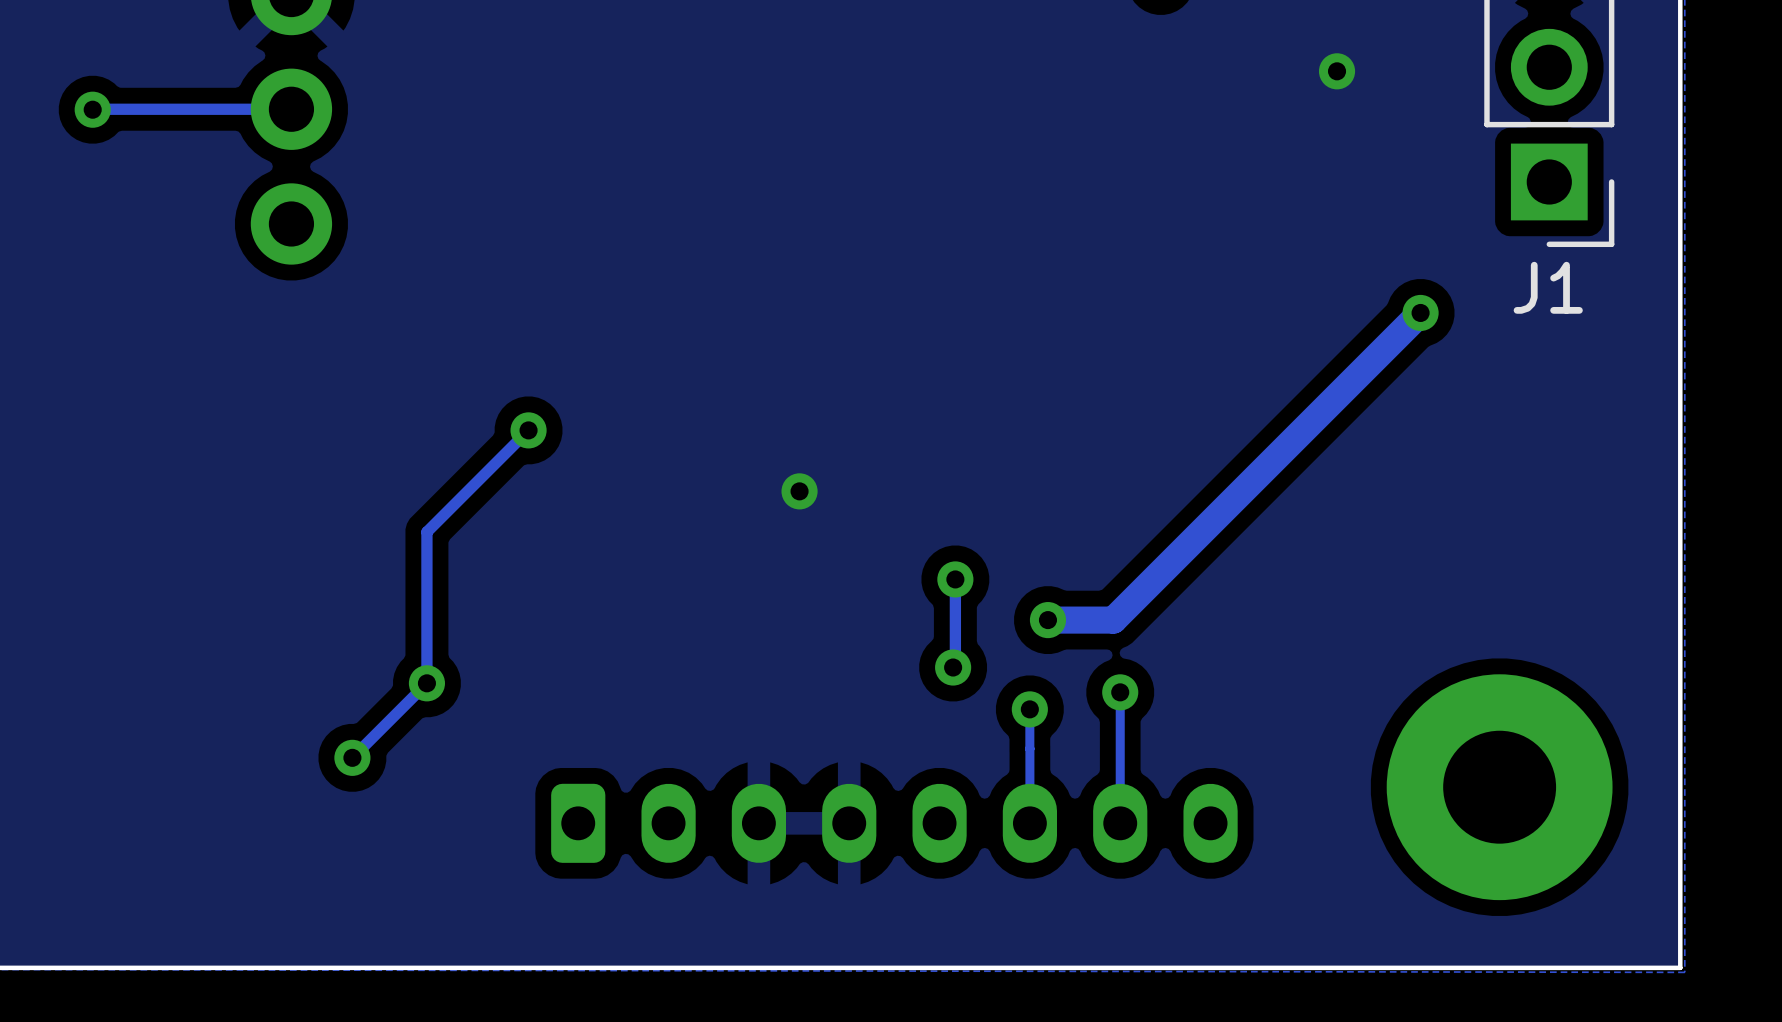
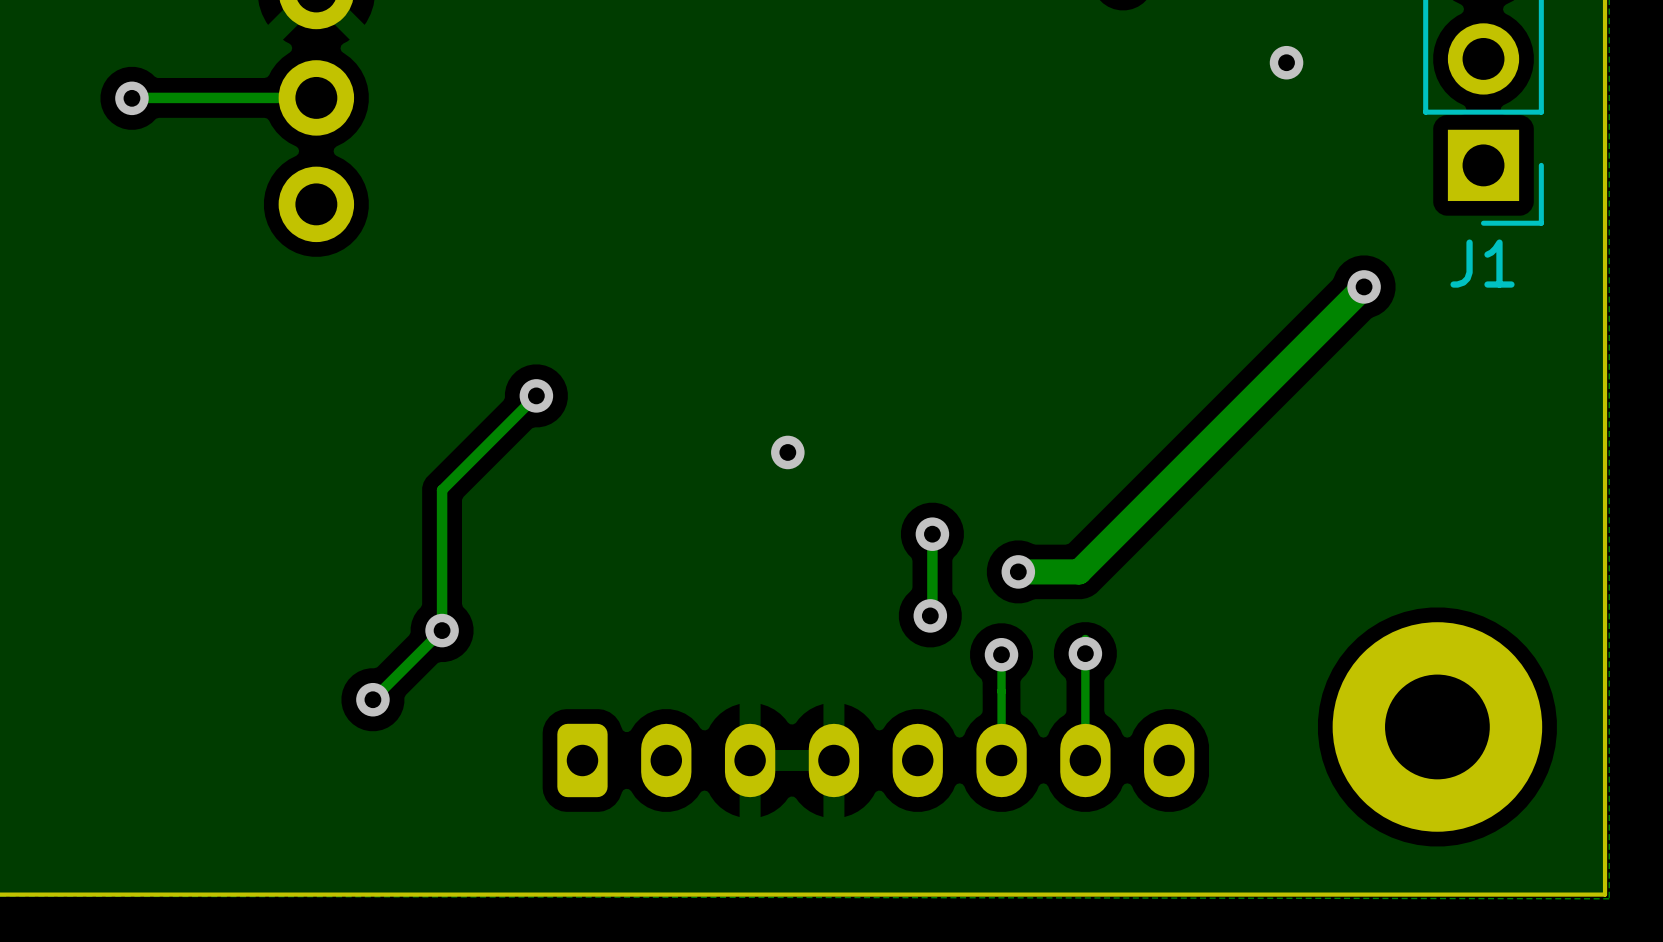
via position: (1120, 692) -> (1085, 653)

